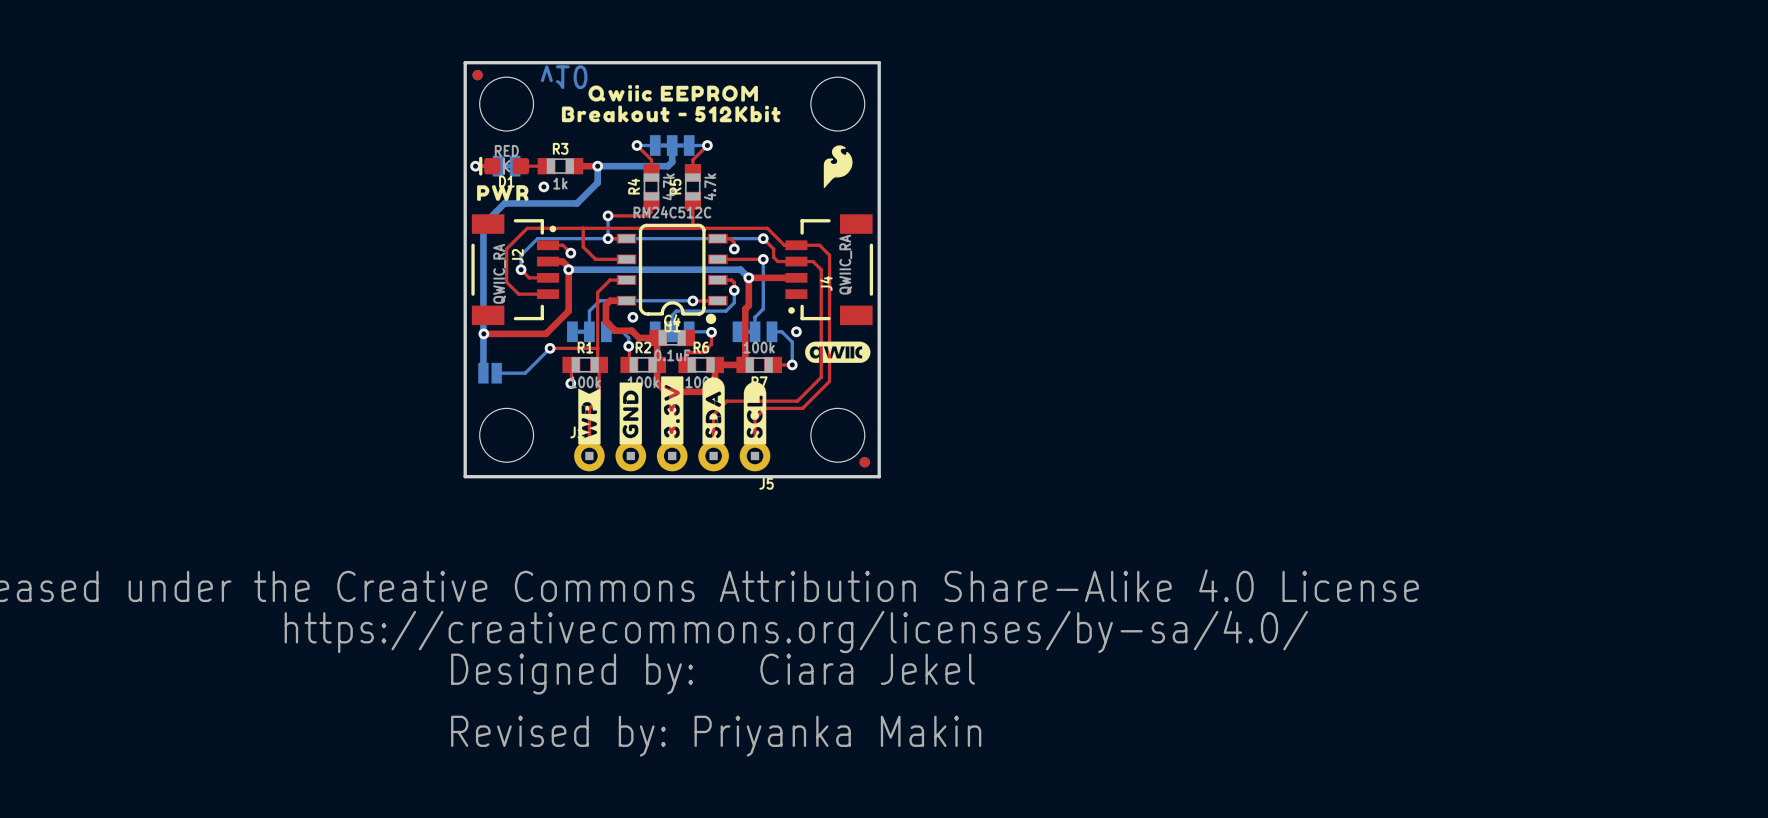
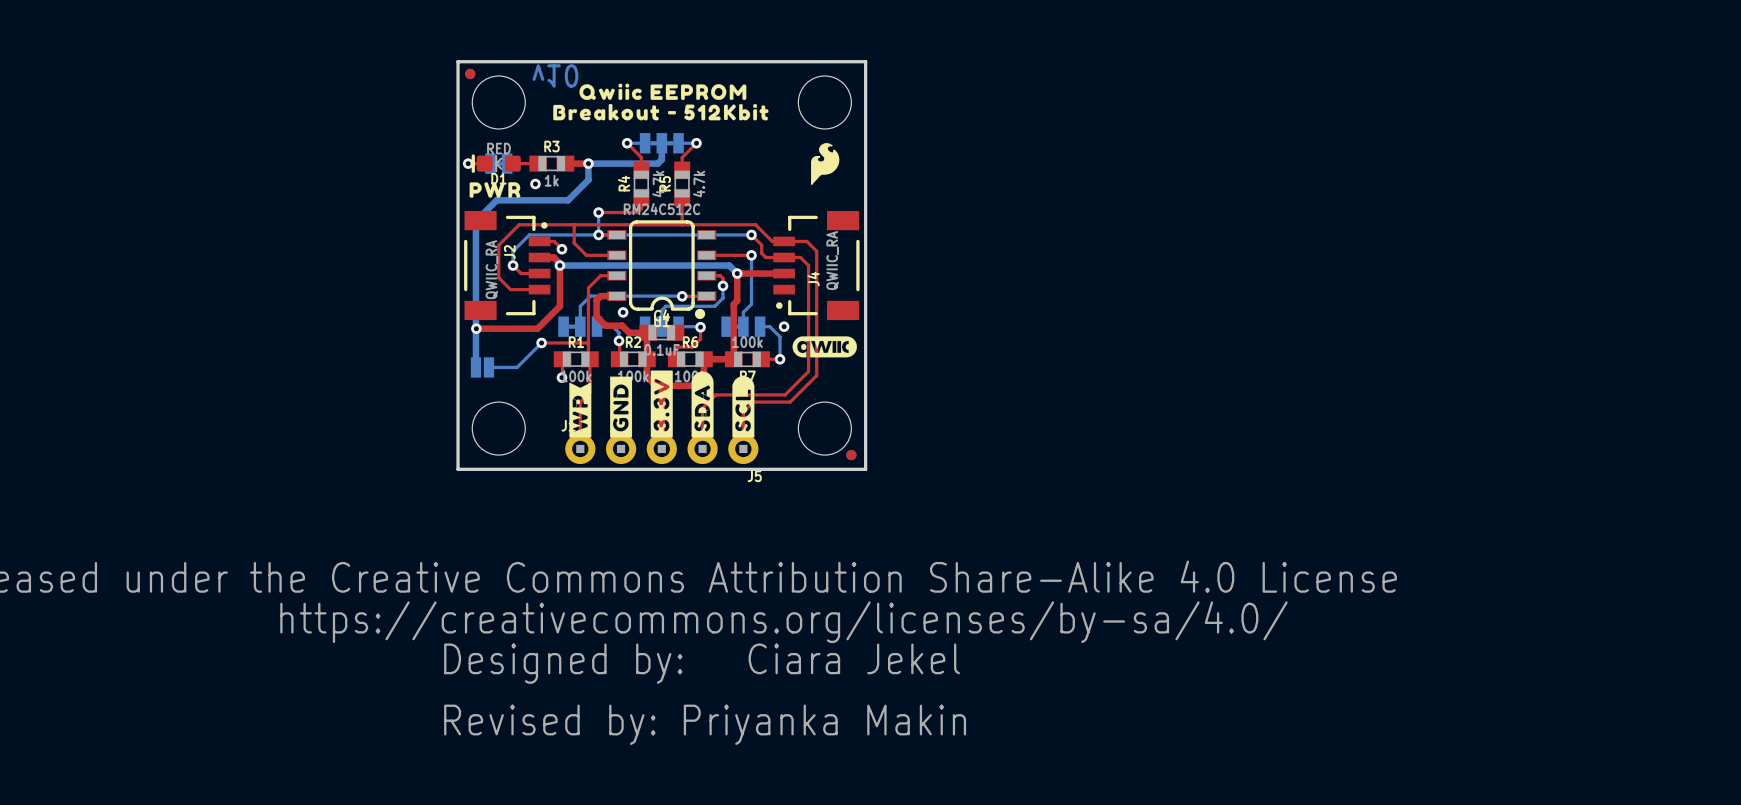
top track: (717, 238) (730, 238) (734, 242) (734, 248) -> none
via: (734, 248) -> none

